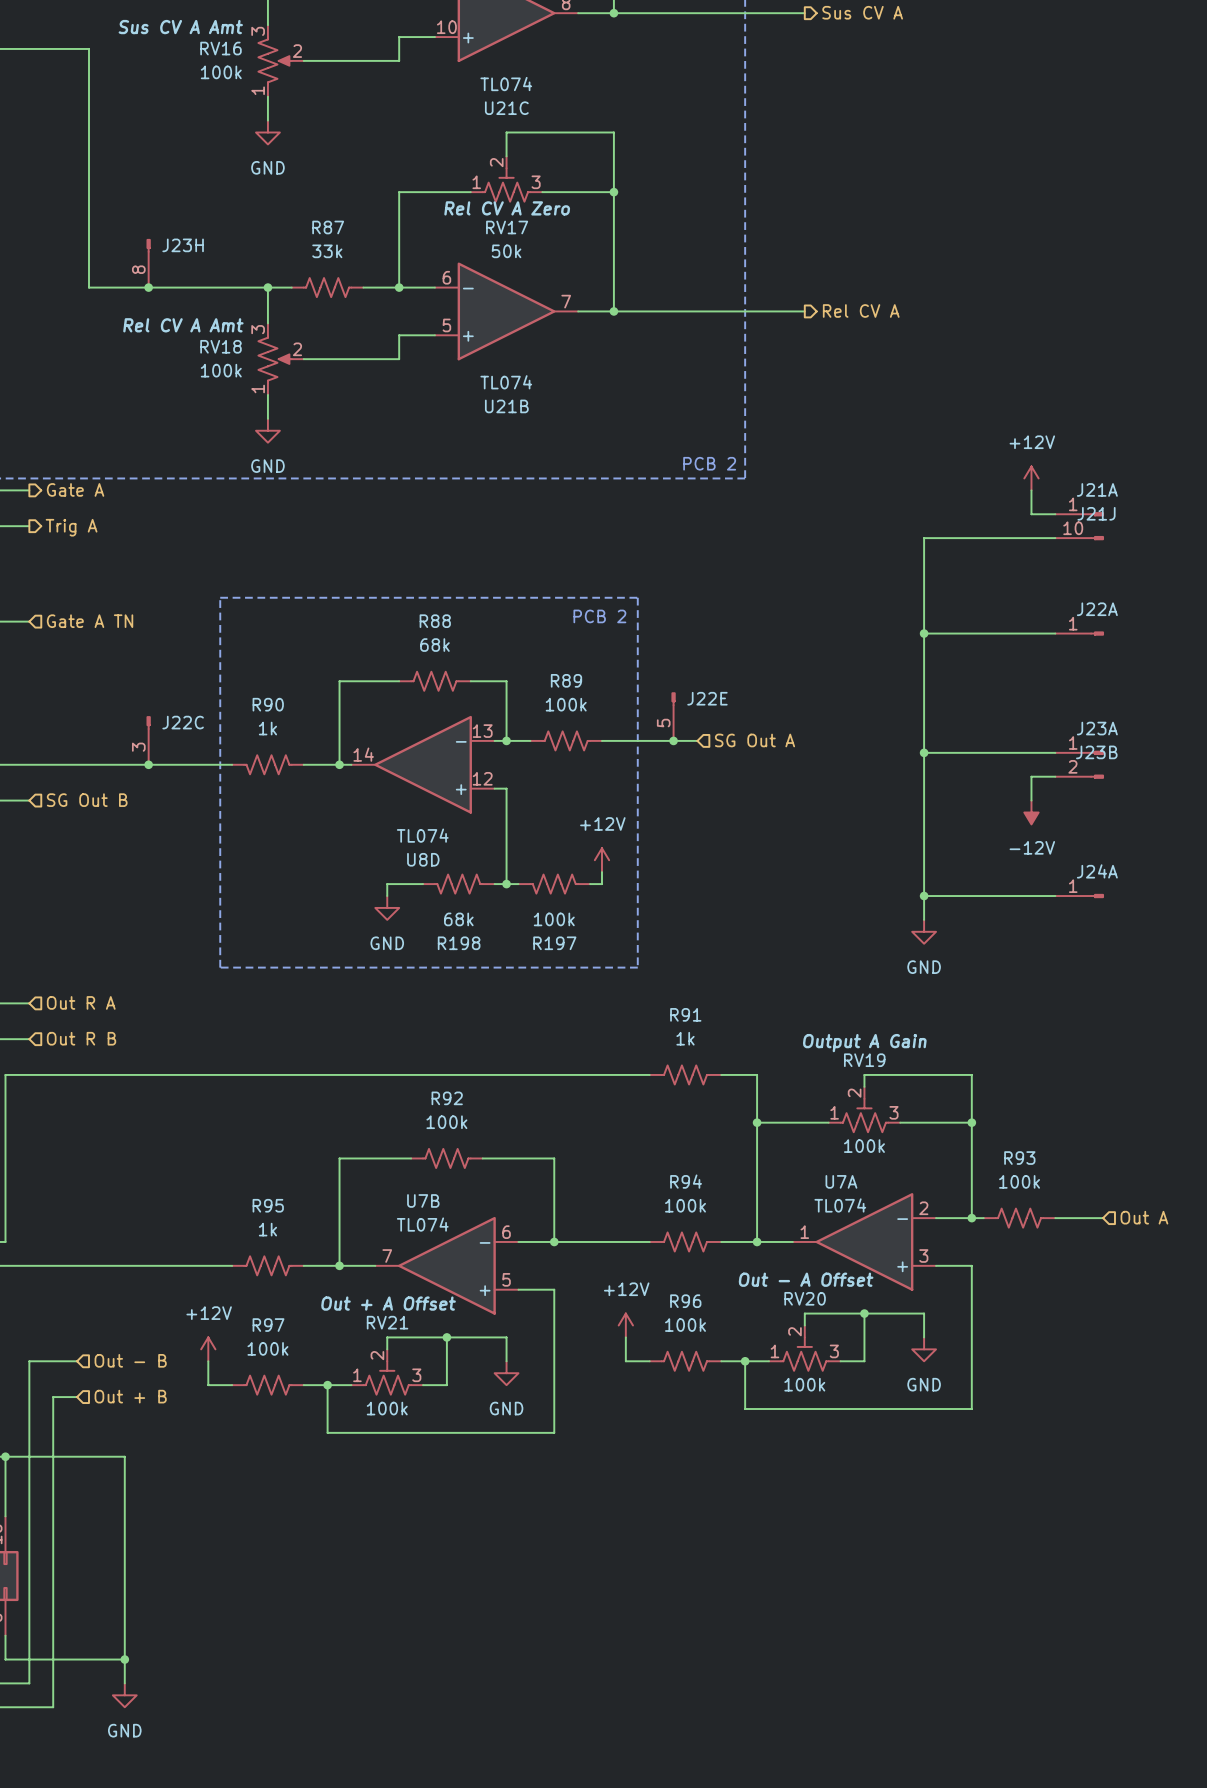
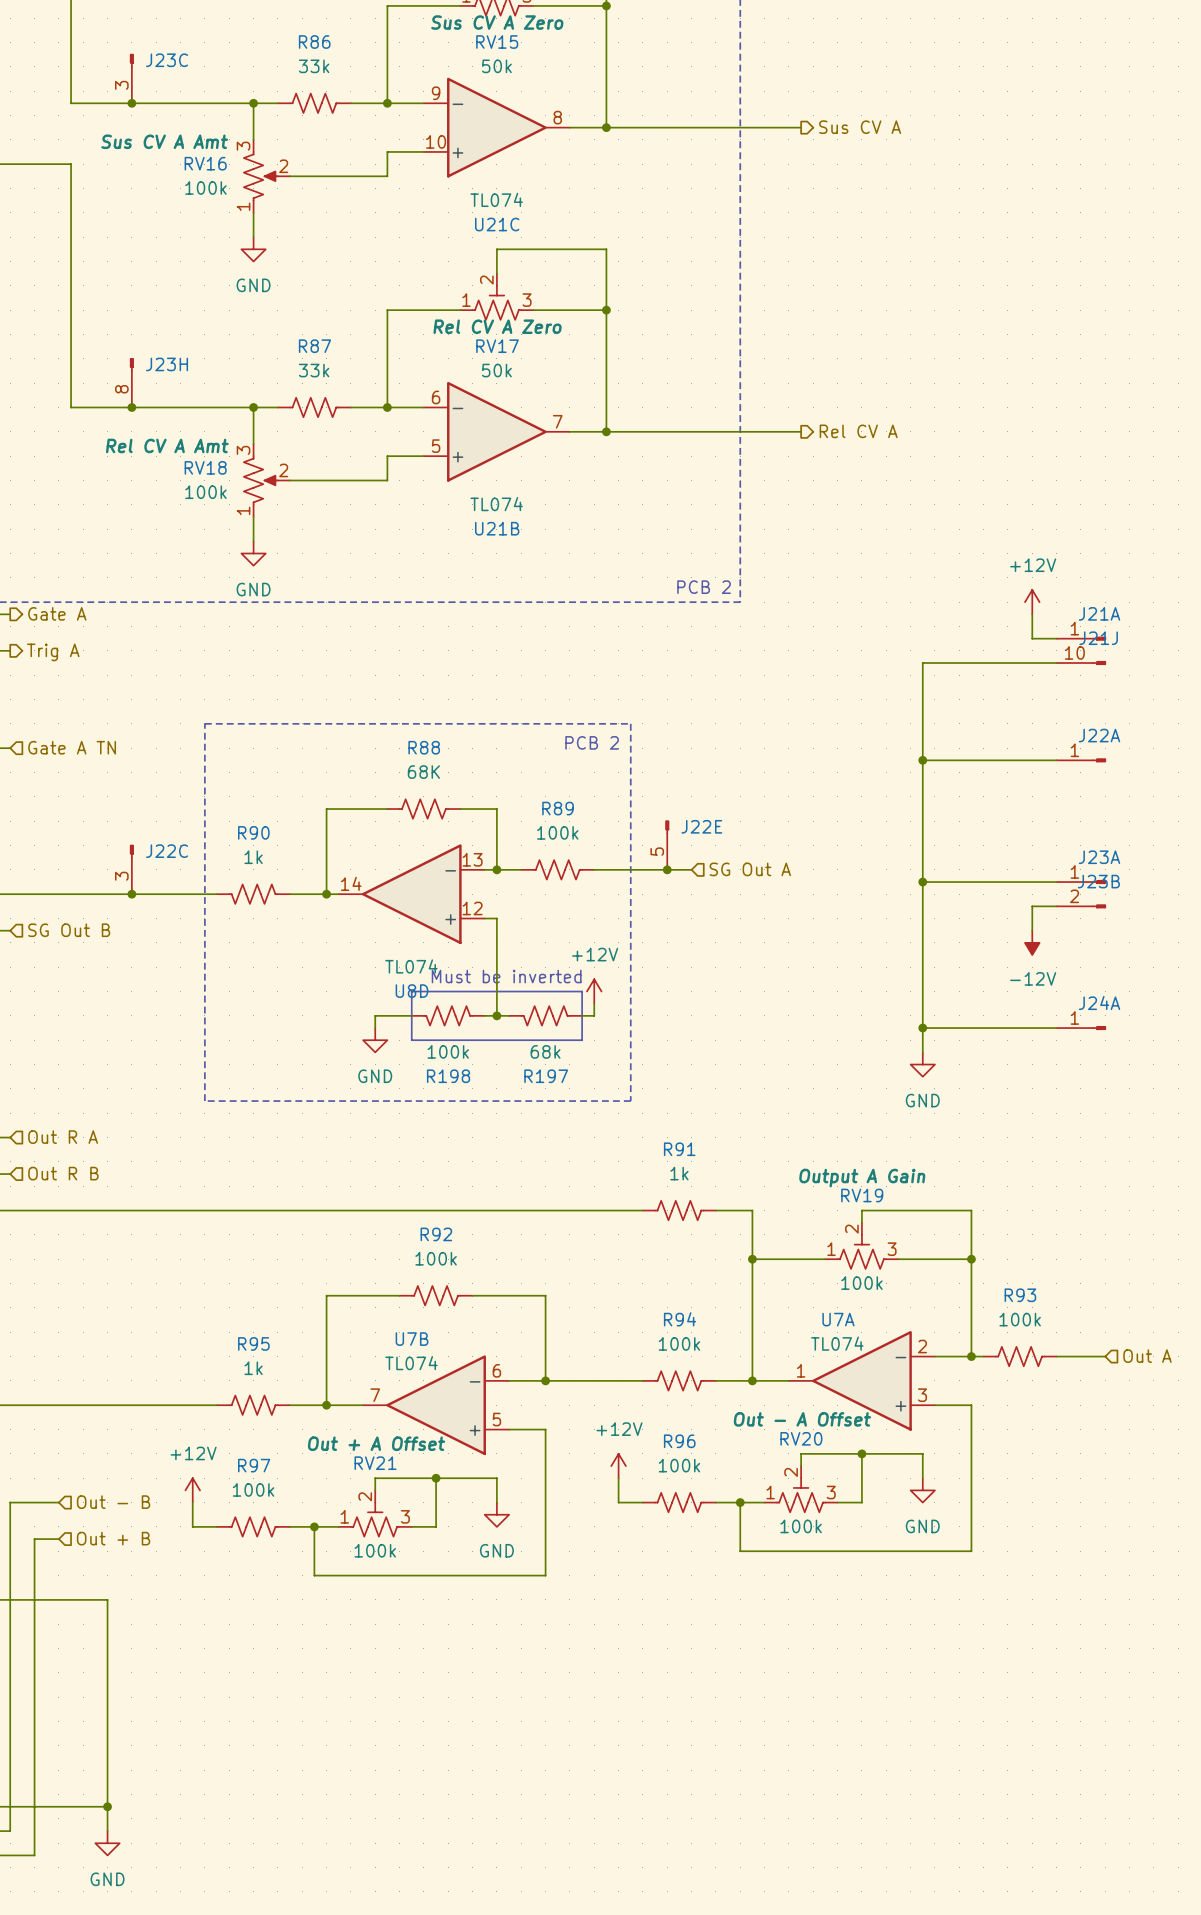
R88 value: 68k (434, 645) -> 68K (423, 772)
text: none -> Must be inverted (506, 976)
line: none -> (411, 991) (582, 991) (582, 1040) (411, 1040) (411, 991)
R198 value: 68k (458, 919) -> 100k (448, 1051)
R197 value: 100k (554, 919) -> 68k (545, 1051)

